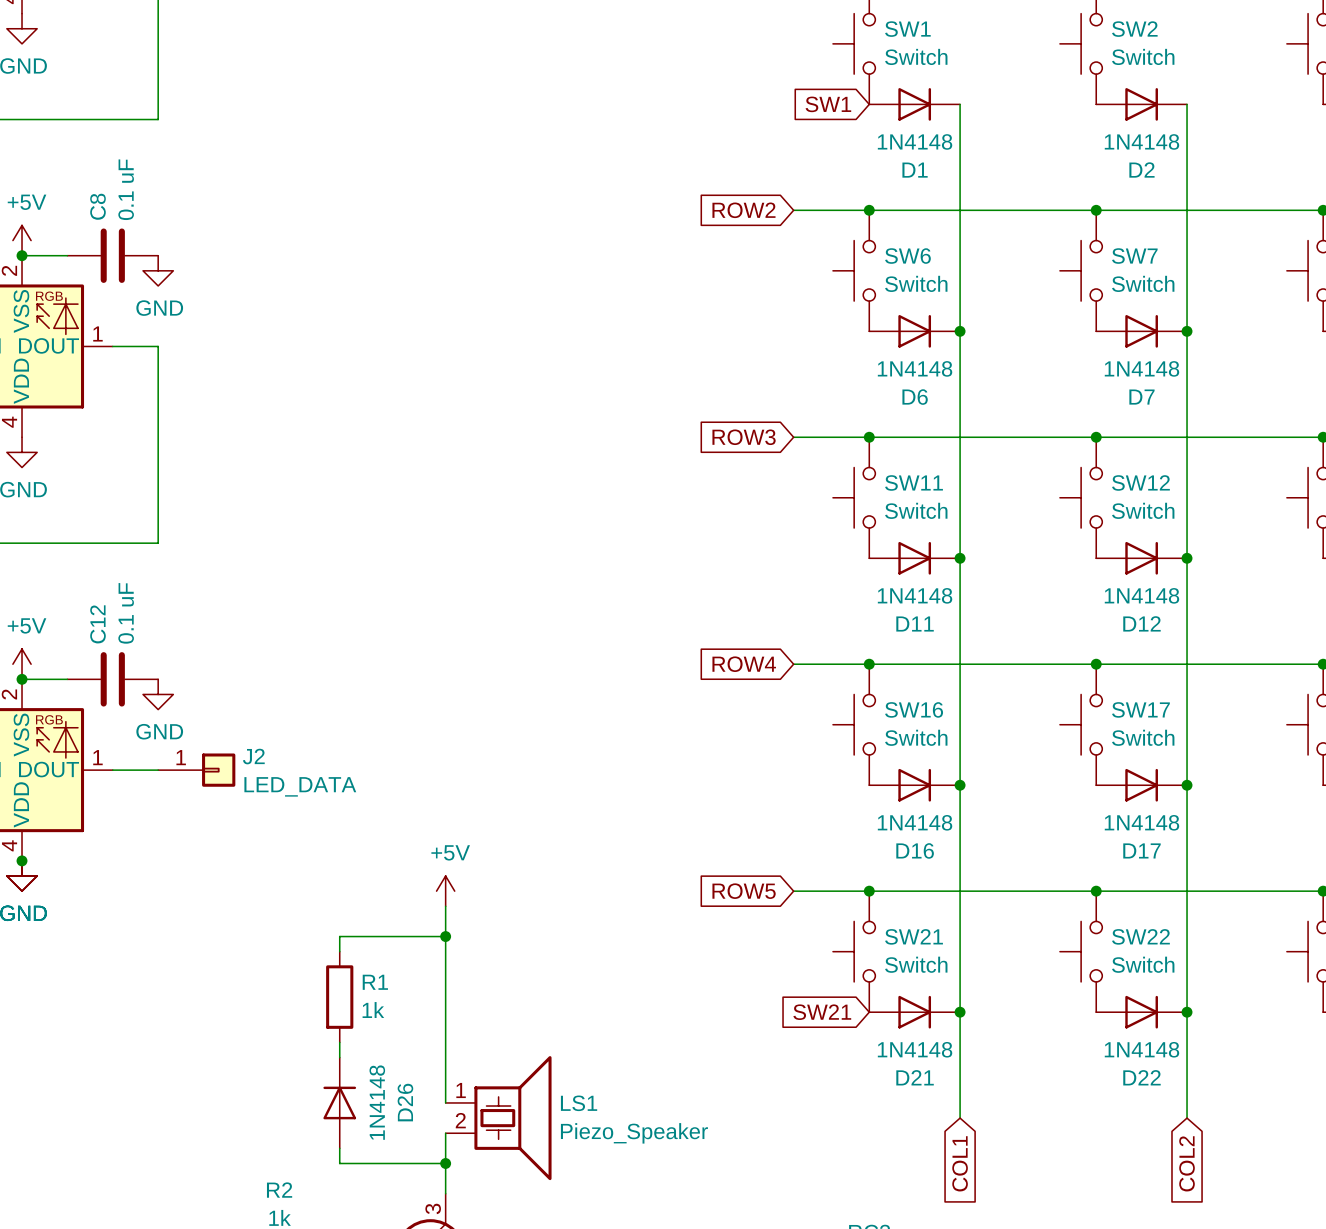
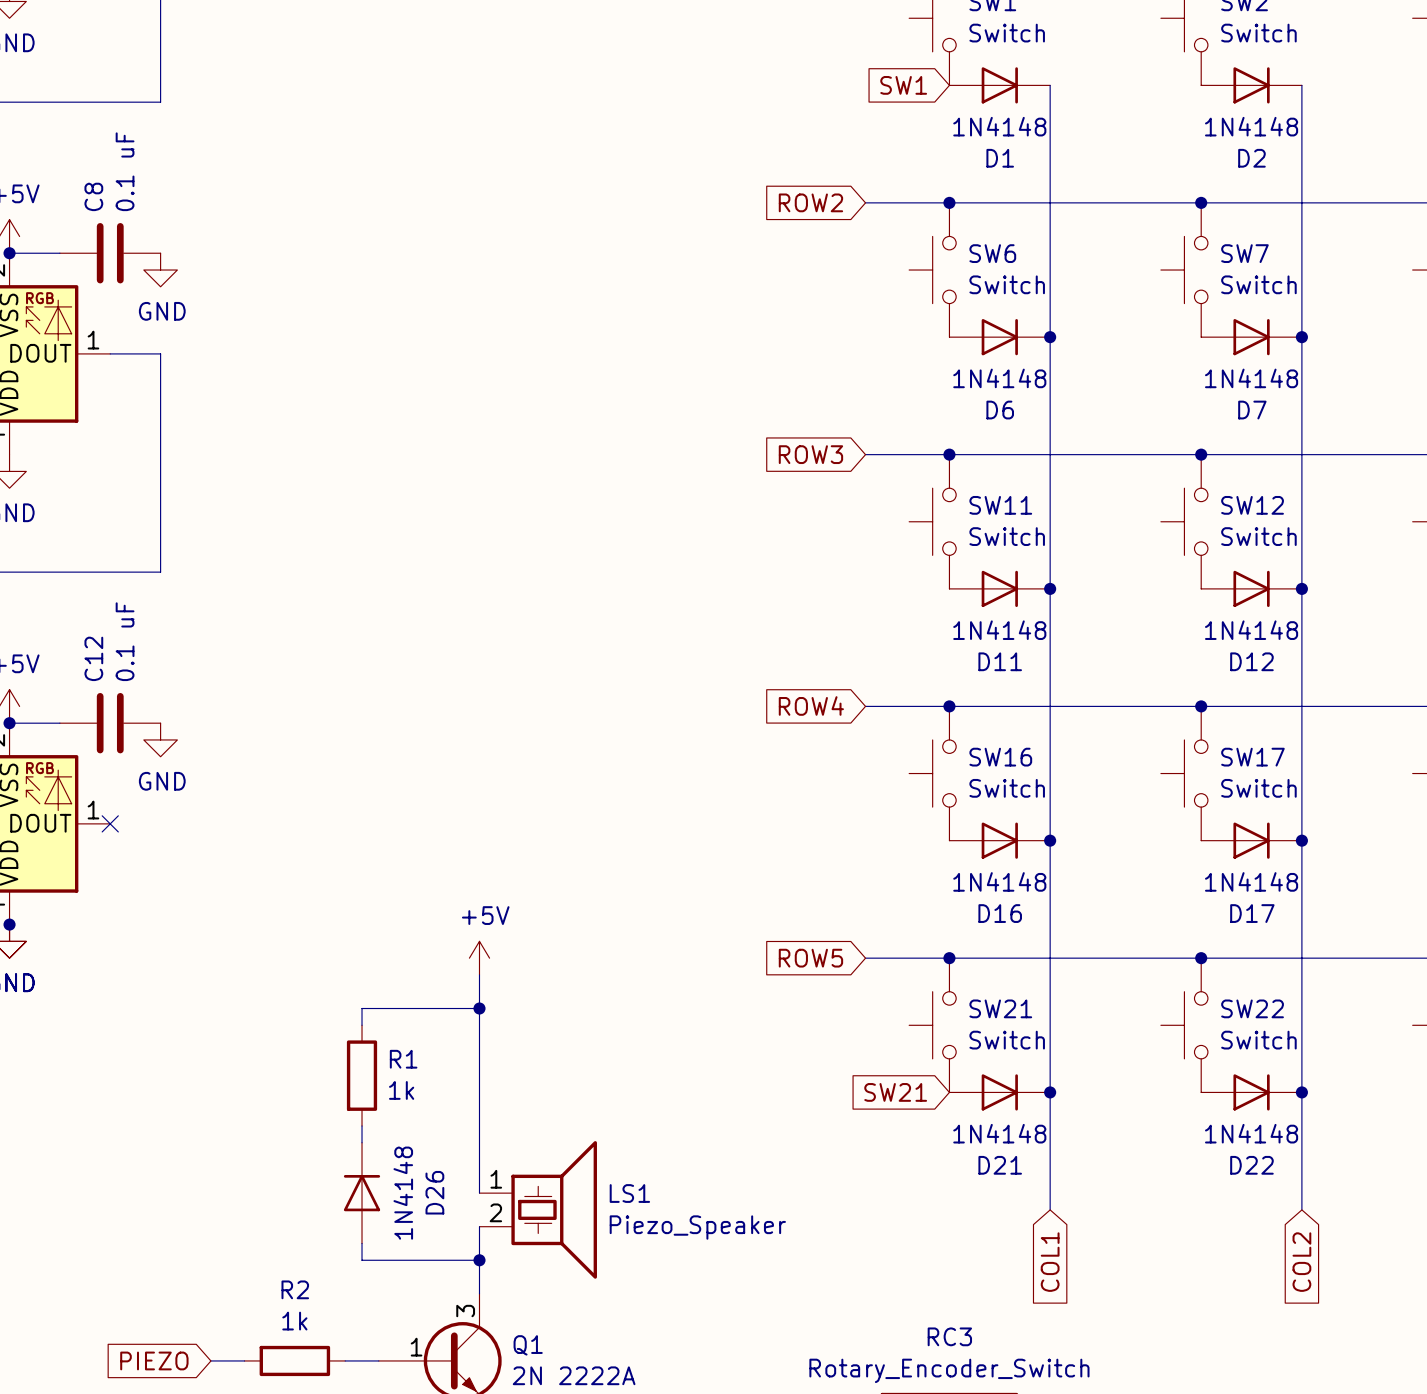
wire: (112, 770) (158, 770) -> none
no-connect mark: none -> (110, 823)
J2: LED_DATA (196, 770) -> none

